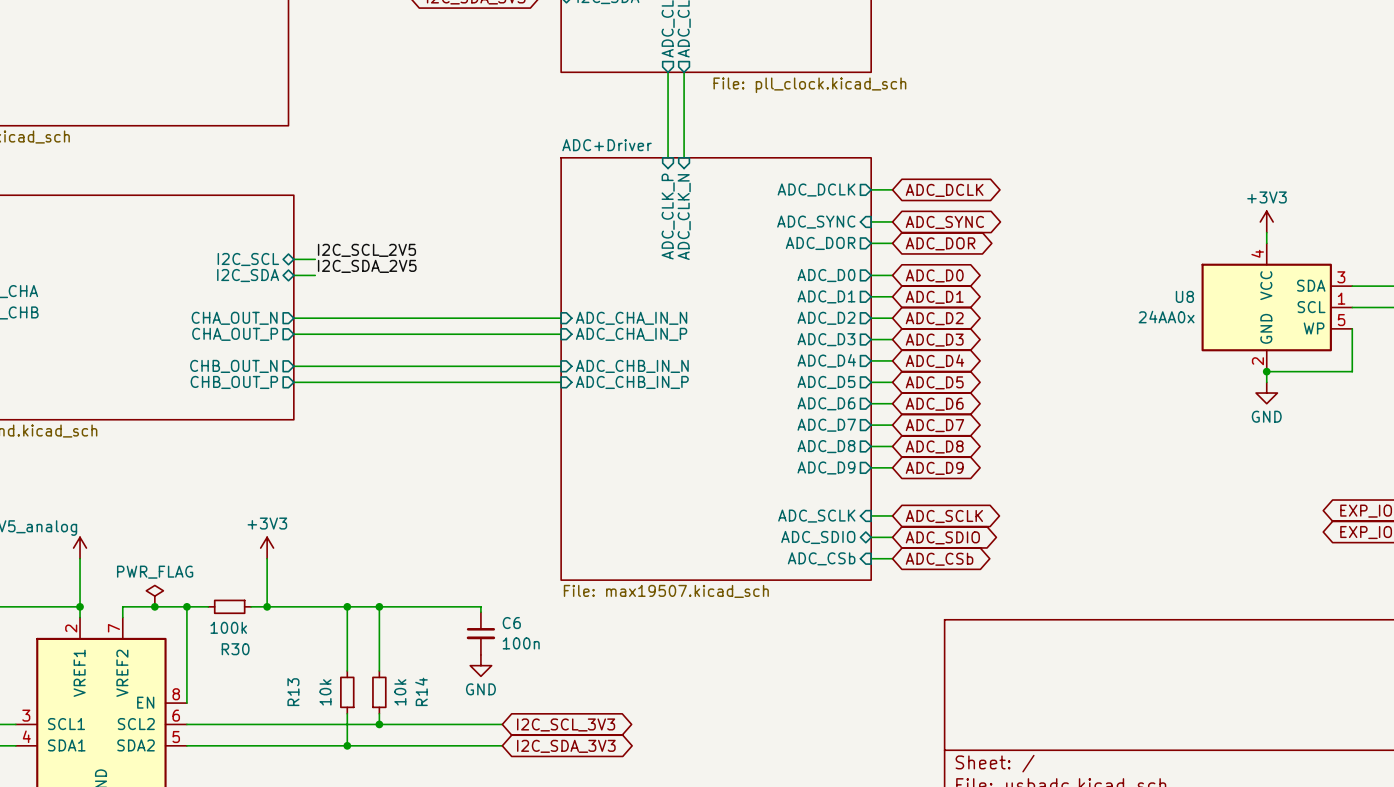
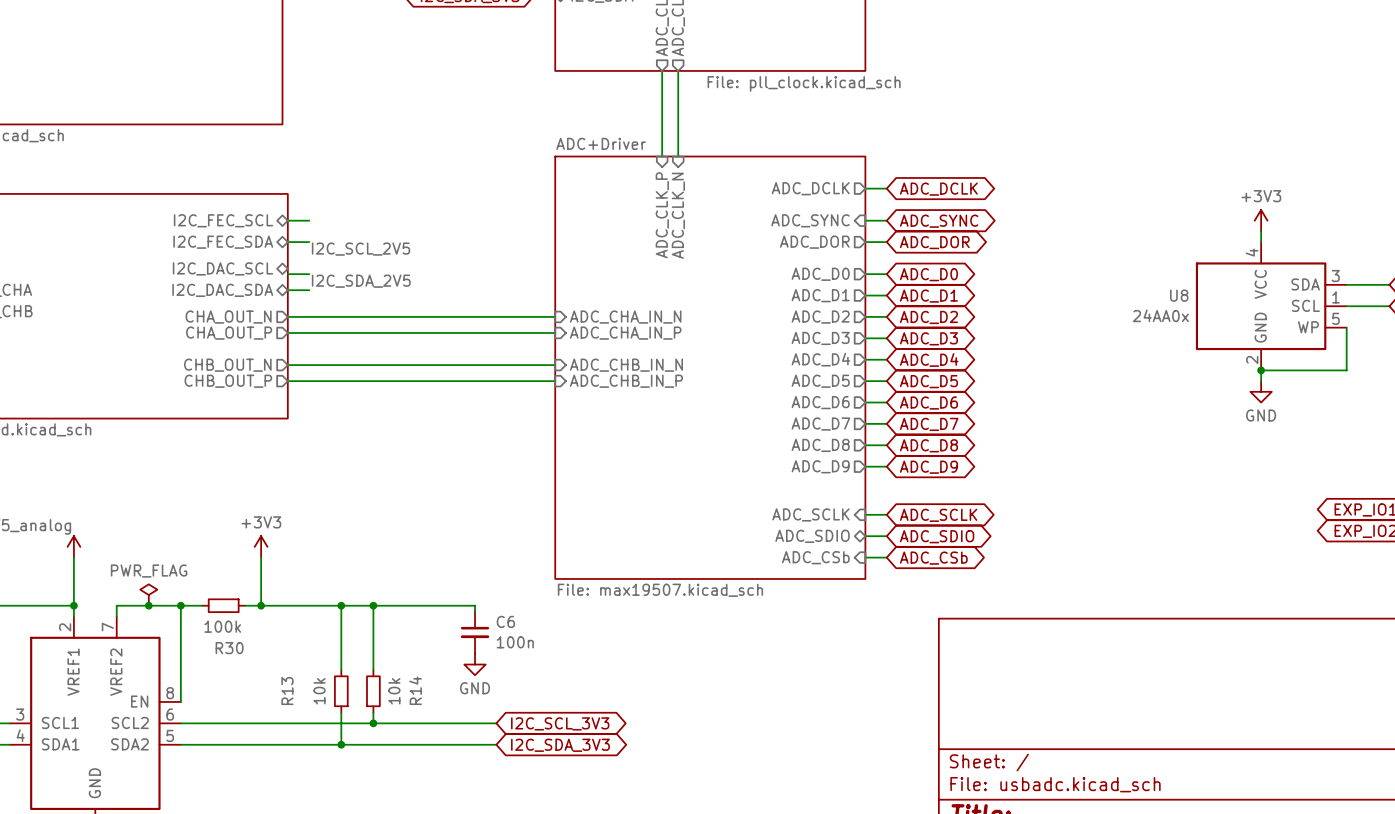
wire: none -> (287, 220) (309, 220)
sheet pin: none -> I2C_FEC_SCL (223, 220)
sheet pin: none -> I2C_FEC_SDA (223, 242)
sheet pin: I2C_SCL (248, 259) -> none
wire: (293, 259) (315, 259) -> (287, 242) (309, 242)
label position: I2C_SDA_2V5 (367, 266) -> I2C_SDA_2V5 (361, 281)
sheet pin: none -> I2C_DAC_SCL (222, 268)
sheet pin: I2C_SDA (248, 275) -> none
sheet pin: none -> I2C_DAC_SDA (222, 290)
wire: none -> (287, 290) (309, 290)

